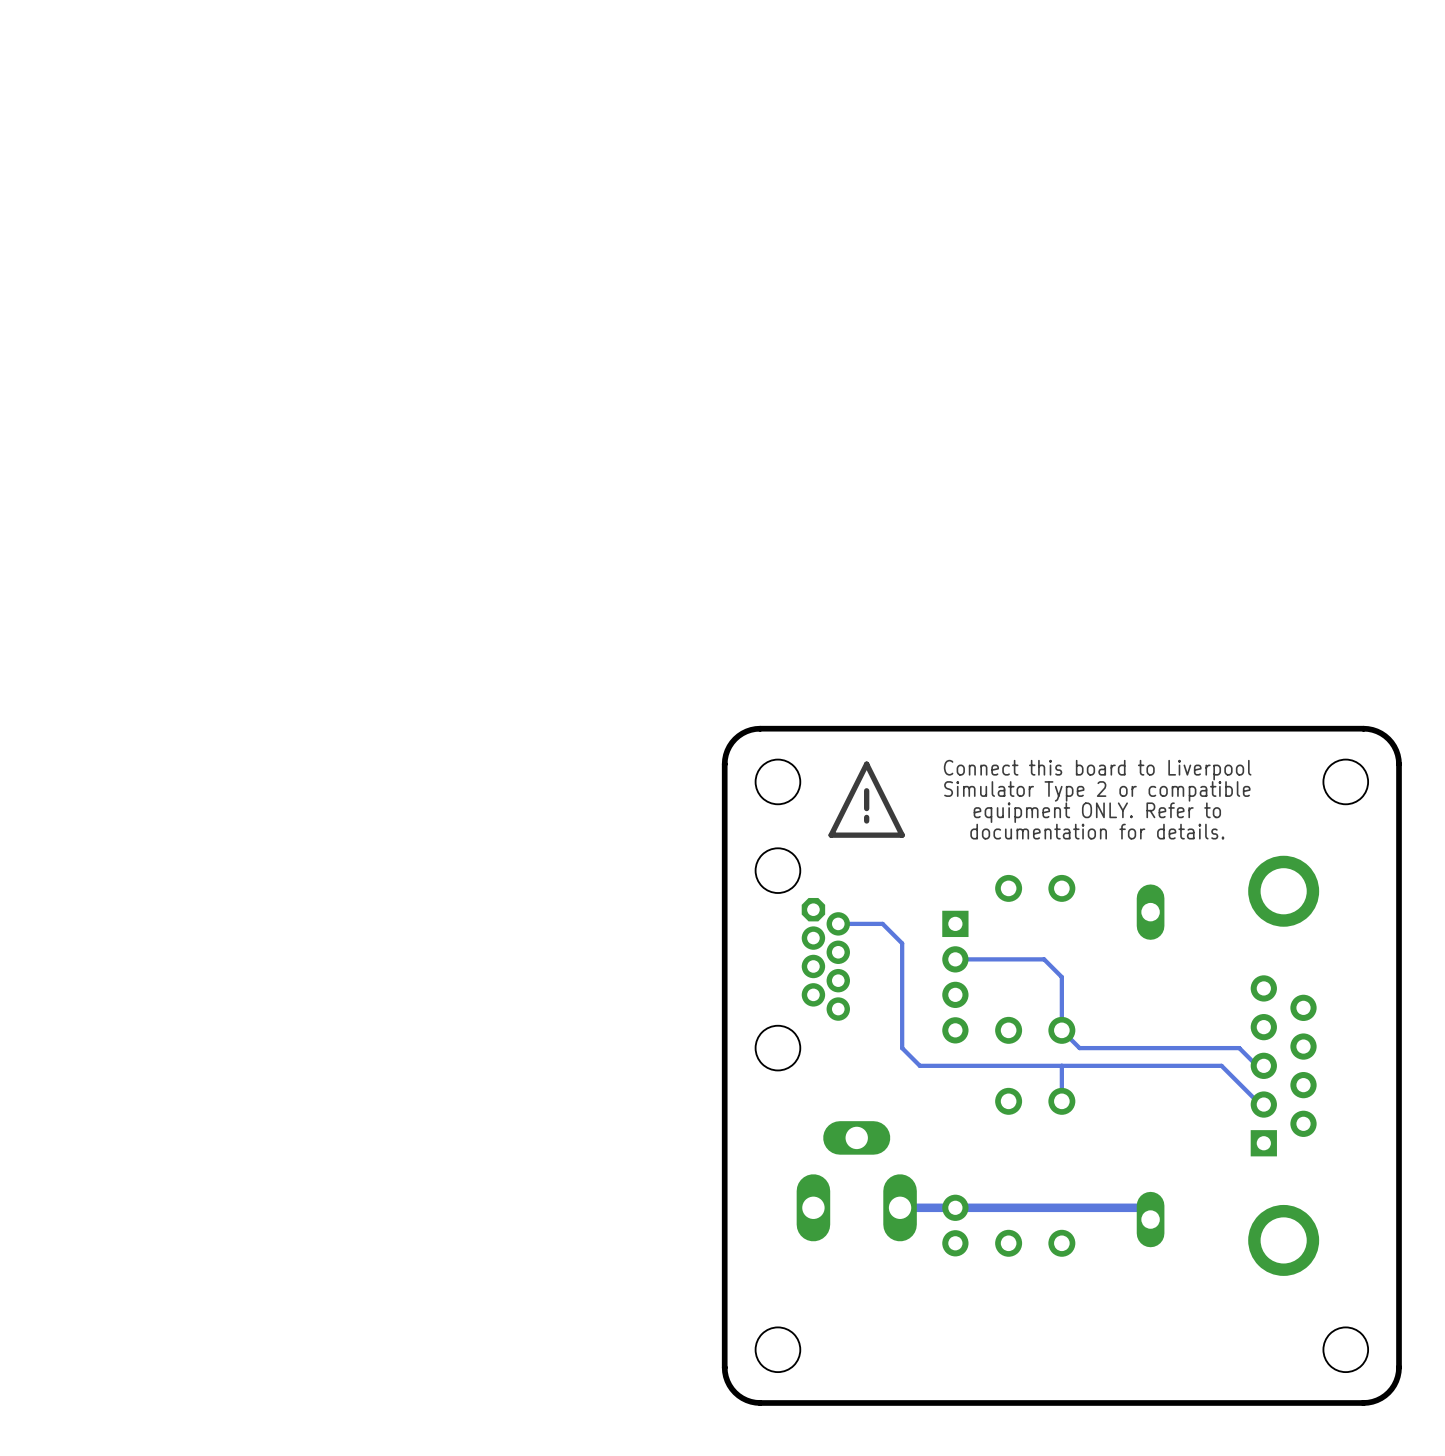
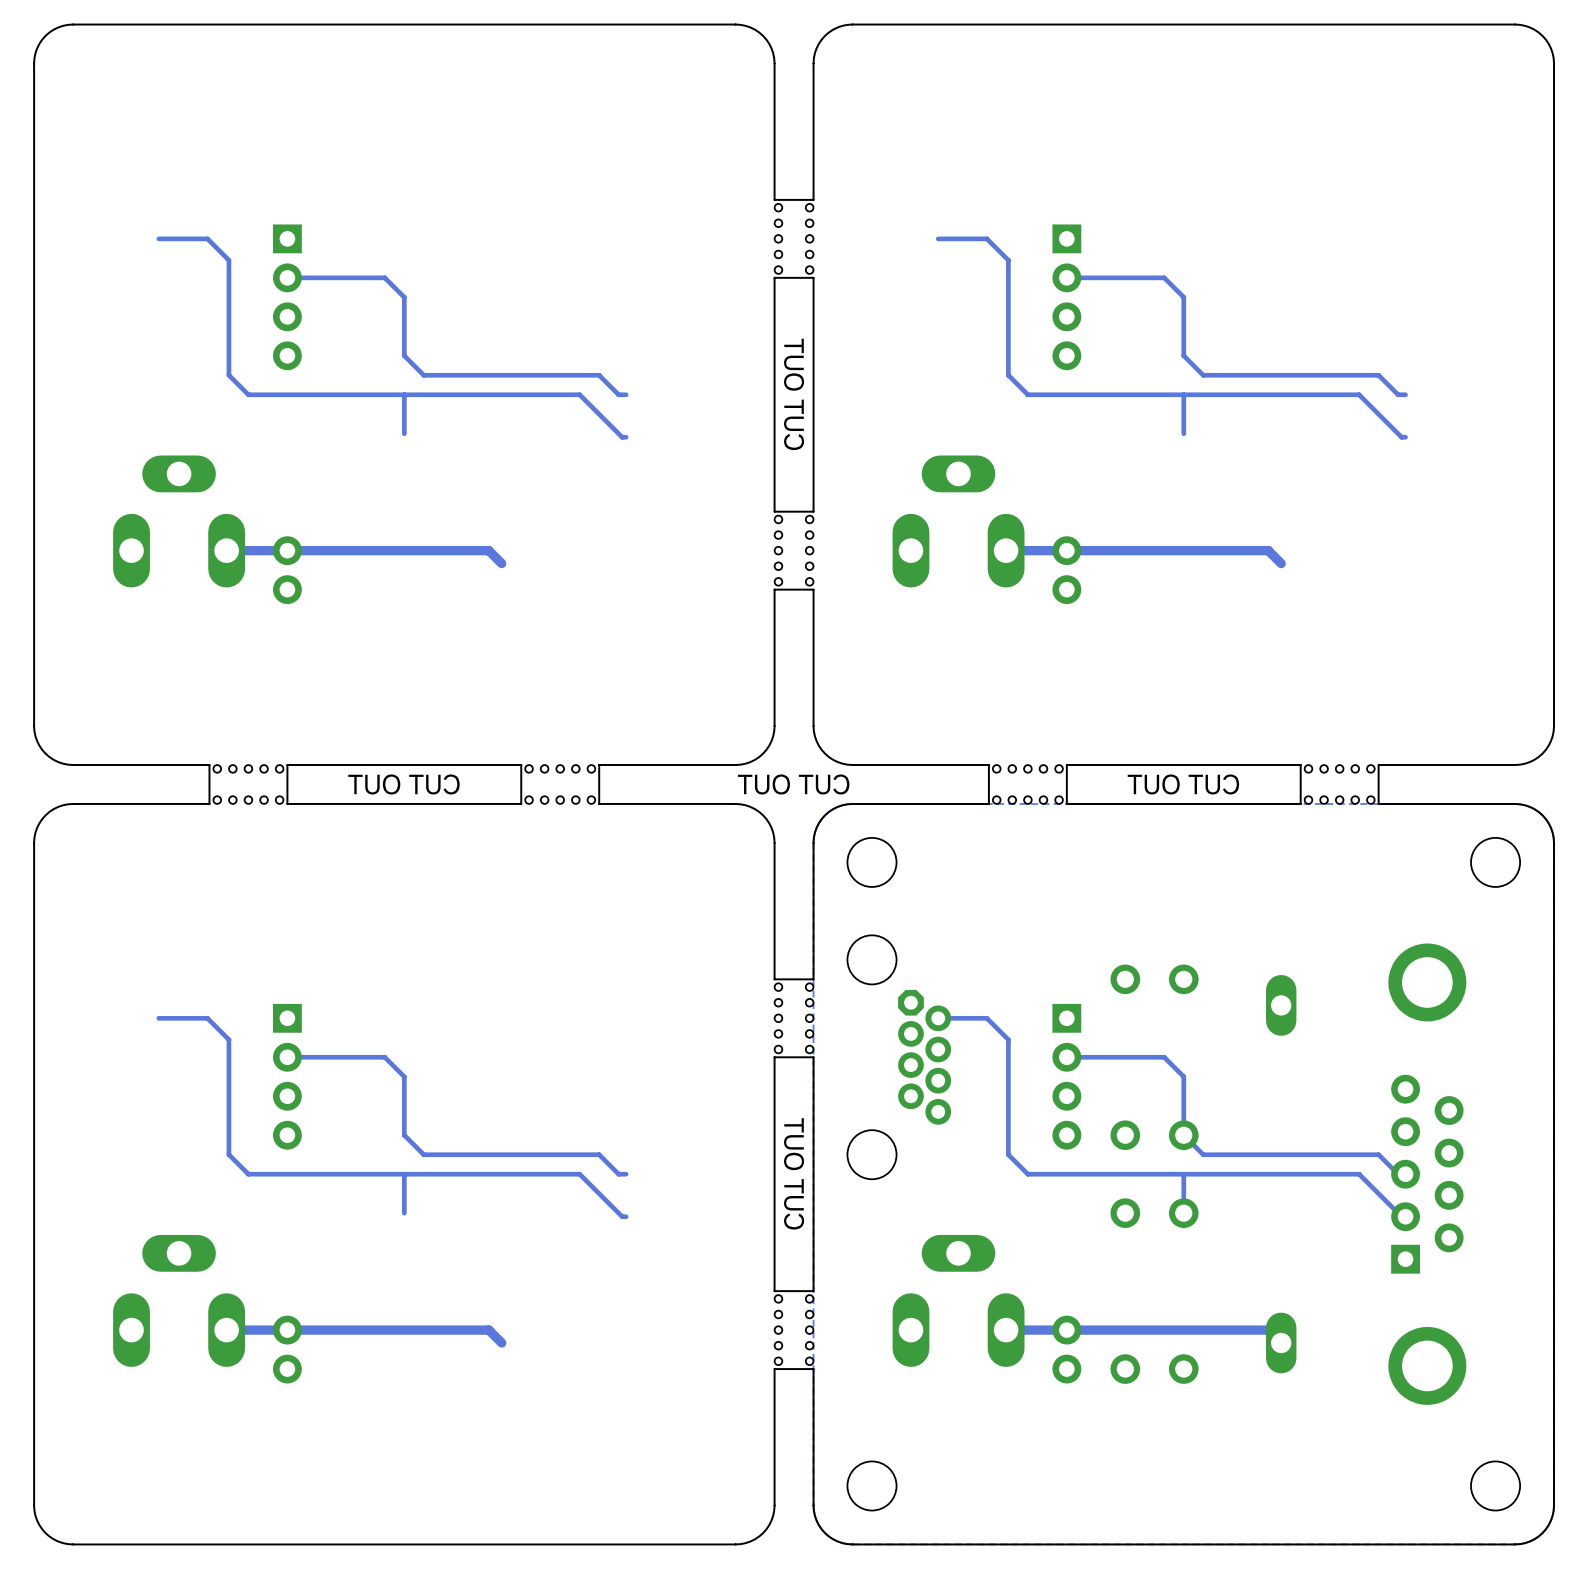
track: none -> (158, 238) (207, 238) (228, 260) (228, 375) (248, 394) (579, 394) (622, 437) (626, 437)
track: none -> (938, 238) (986, 238) (1008, 260) (1008, 375) (1027, 394) (1359, 394) (1401, 437) (1405, 437)
track: none -> (287, 277) (384, 277) (404, 297) (404, 355) (423, 375) (599, 375) (618, 394) (626, 394)
track: none -> (1066, 277) (1164, 277) (1183, 297) (1183, 355) (1203, 375) (1378, 375) (1398, 394) (1405, 394)
part: none -> (287, 297)
part: none -> (1066, 297)
track: none -> (404, 394) (404, 433)
track: none -> (1183, 394) (1183, 433)
part: none -> (179, 521)
part: none -> (958, 521)
track: none -> (226, 550) (488, 550) (501, 563)
track: none -> (1006, 550) (1268, 550) (1281, 563)
part: none -> (287, 570)
part: none -> (1066, 570)
part: none -> (794, 784)
board edge: (1363, 728) (760, 728) (746, 731) (735, 739) (727, 750) (724, 764) (724, 1367) (727, 1381) (735, 1392) (746, 1400) (760, 1402) (1363, 1402) (1377, 1400) (1388, 1392) (1396, 1381) (1399, 1367) (1399, 764) (1396, 750) (1388, 739) (1377, 731) (1363, 728) -> none
drawing: [828, 761, 905, 838] -> none
text: Connect this board to Liverpool (1097, 770) -> none
text: Simulator Type 2 or compatible (1097, 791) -> none
text: equipment ONLY. Refer to (1097, 812) -> none
text: documentation for details. (1097, 831) -> none
track: none -> (158, 1018) (207, 1018) (228, 1039) (228, 1154) (248, 1174) (579, 1174) (622, 1216) (626, 1216)
track: none -> (287, 1057) (384, 1057) (404, 1076) (404, 1135) (423, 1154) (599, 1154) (618, 1174) (626, 1174)
part: none -> (287, 1076)
track: none -> (404, 1174) (404, 1213)
part: none -> (179, 1300)
track: none -> (226, 1330) (488, 1330) (501, 1342)
part: none -> (287, 1349)

